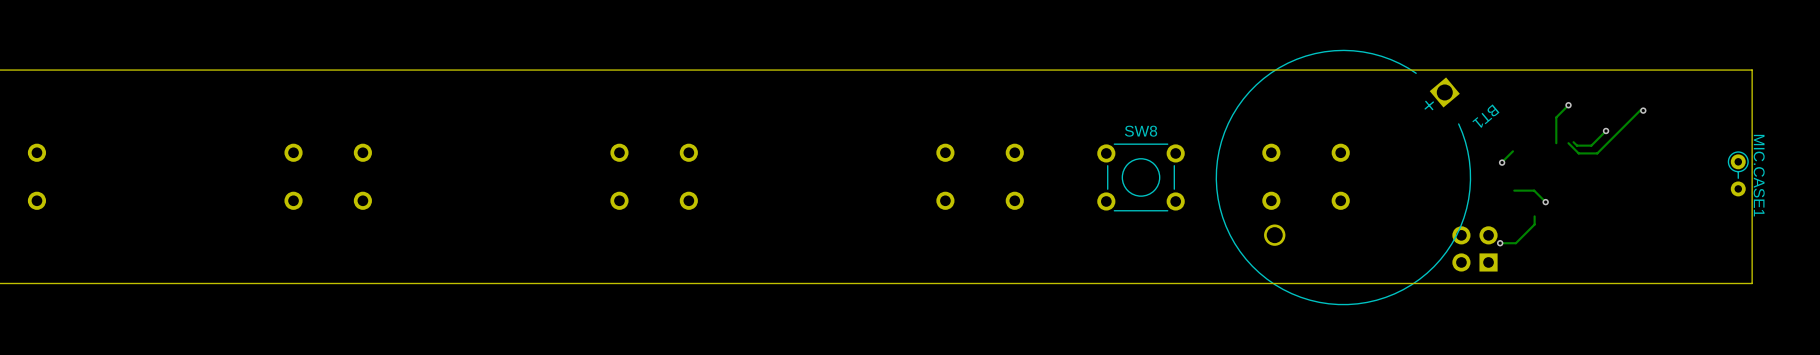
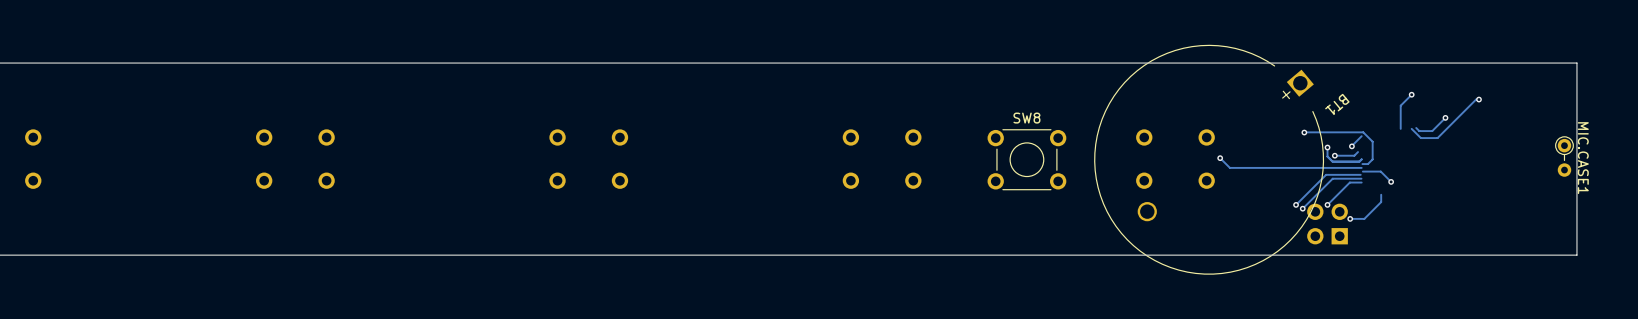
track: none -> (1304, 132) (1363, 132) (1372, 141) (1372, 159) (1367, 164) (1362, 164)
via: none -> (1304, 132)
track: none -> (1327, 147) (1327, 156) (1332, 161) (1359, 161) (1361, 159)
via: none -> (1327, 147)
track: none -> (1358, 152) (1354, 155) (1334, 155)
via: none -> (1334, 155)
track: none -> (1220, 158) (1229, 167) (1361, 167)
via: none -> (1220, 158)
track: none -> (1360, 174) (1326, 174) (1296, 204)
track: none -> (1361, 178) (1332, 178) (1302, 208)
track: none -> (1361, 182) (1349, 182) (1327, 204)
via: none -> (1296, 204)
via: none -> (1327, 204)
via: none -> (1302, 208)

